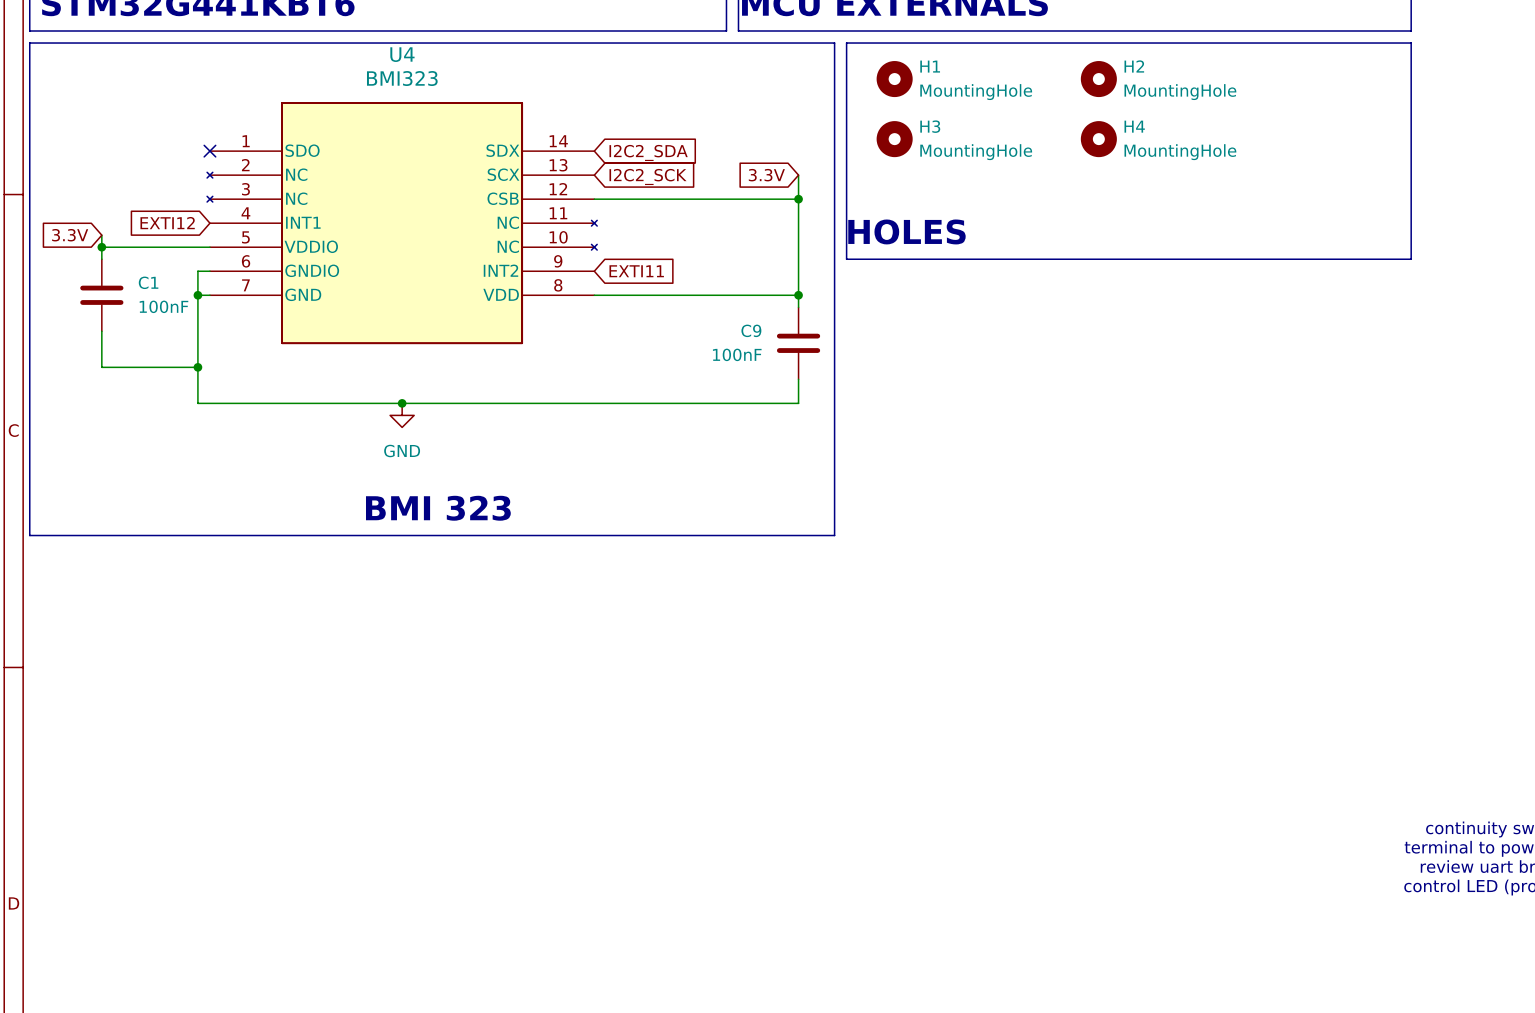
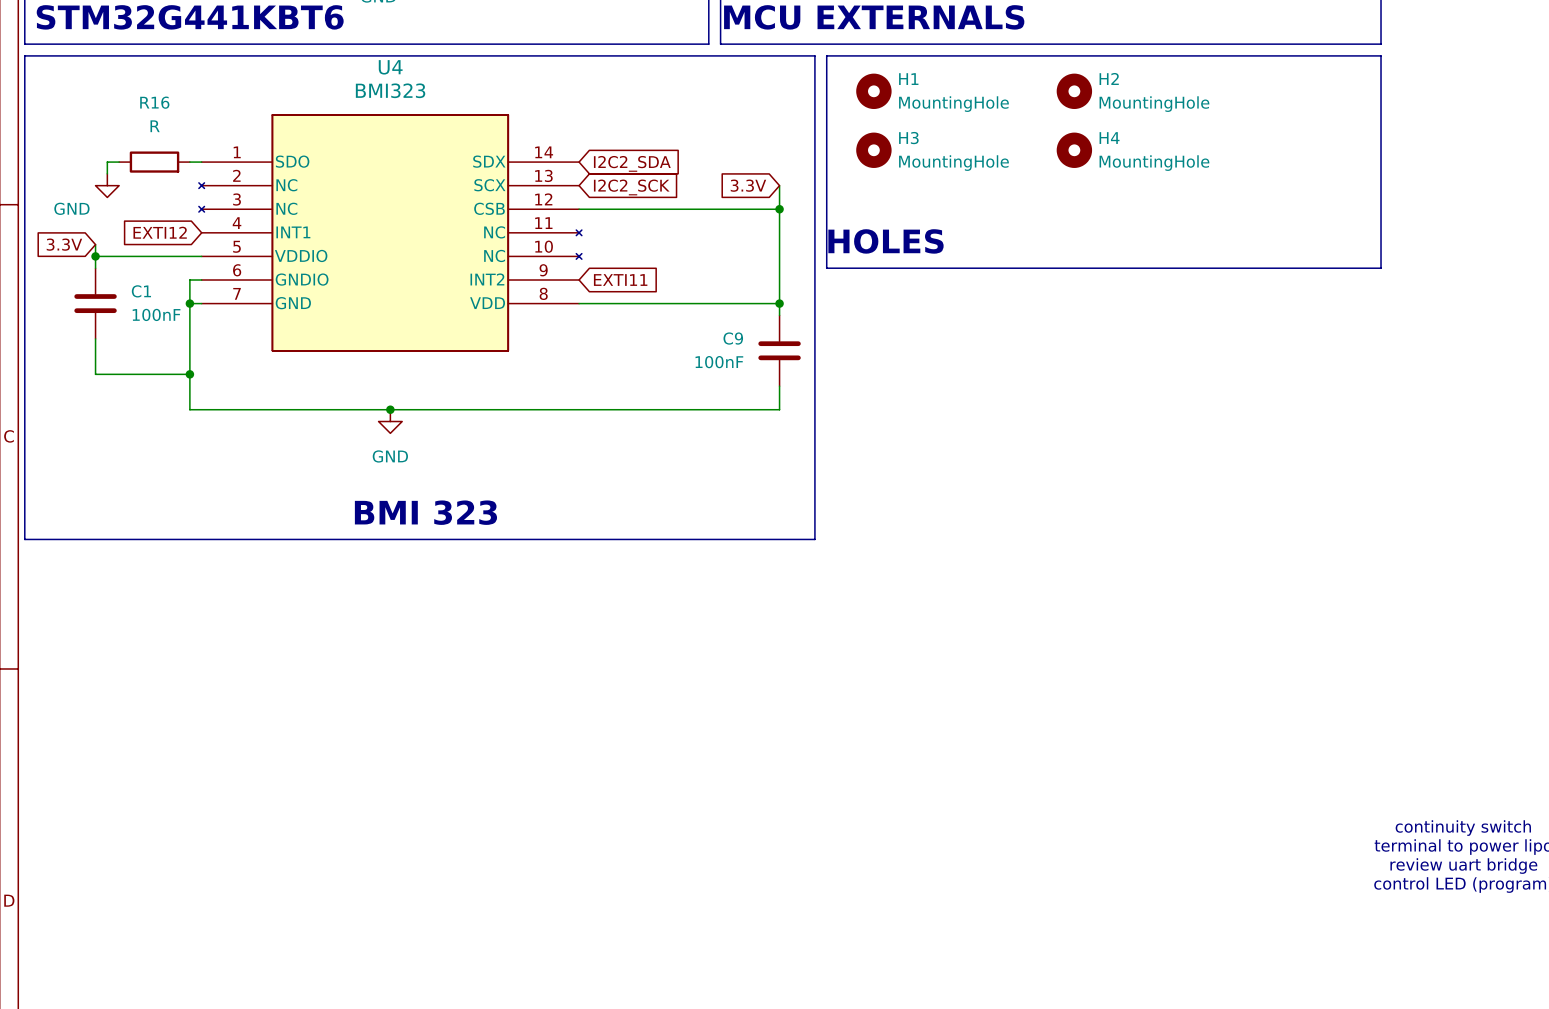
wire: none -> (119, 162) (107, 162) (107, 173)
R16: none -> R (154, 162)
wire: none -> (189, 162) (201, 162)
no-connect mark: (209, 151) -> none
power symbol: none -> GND (107, 185)

